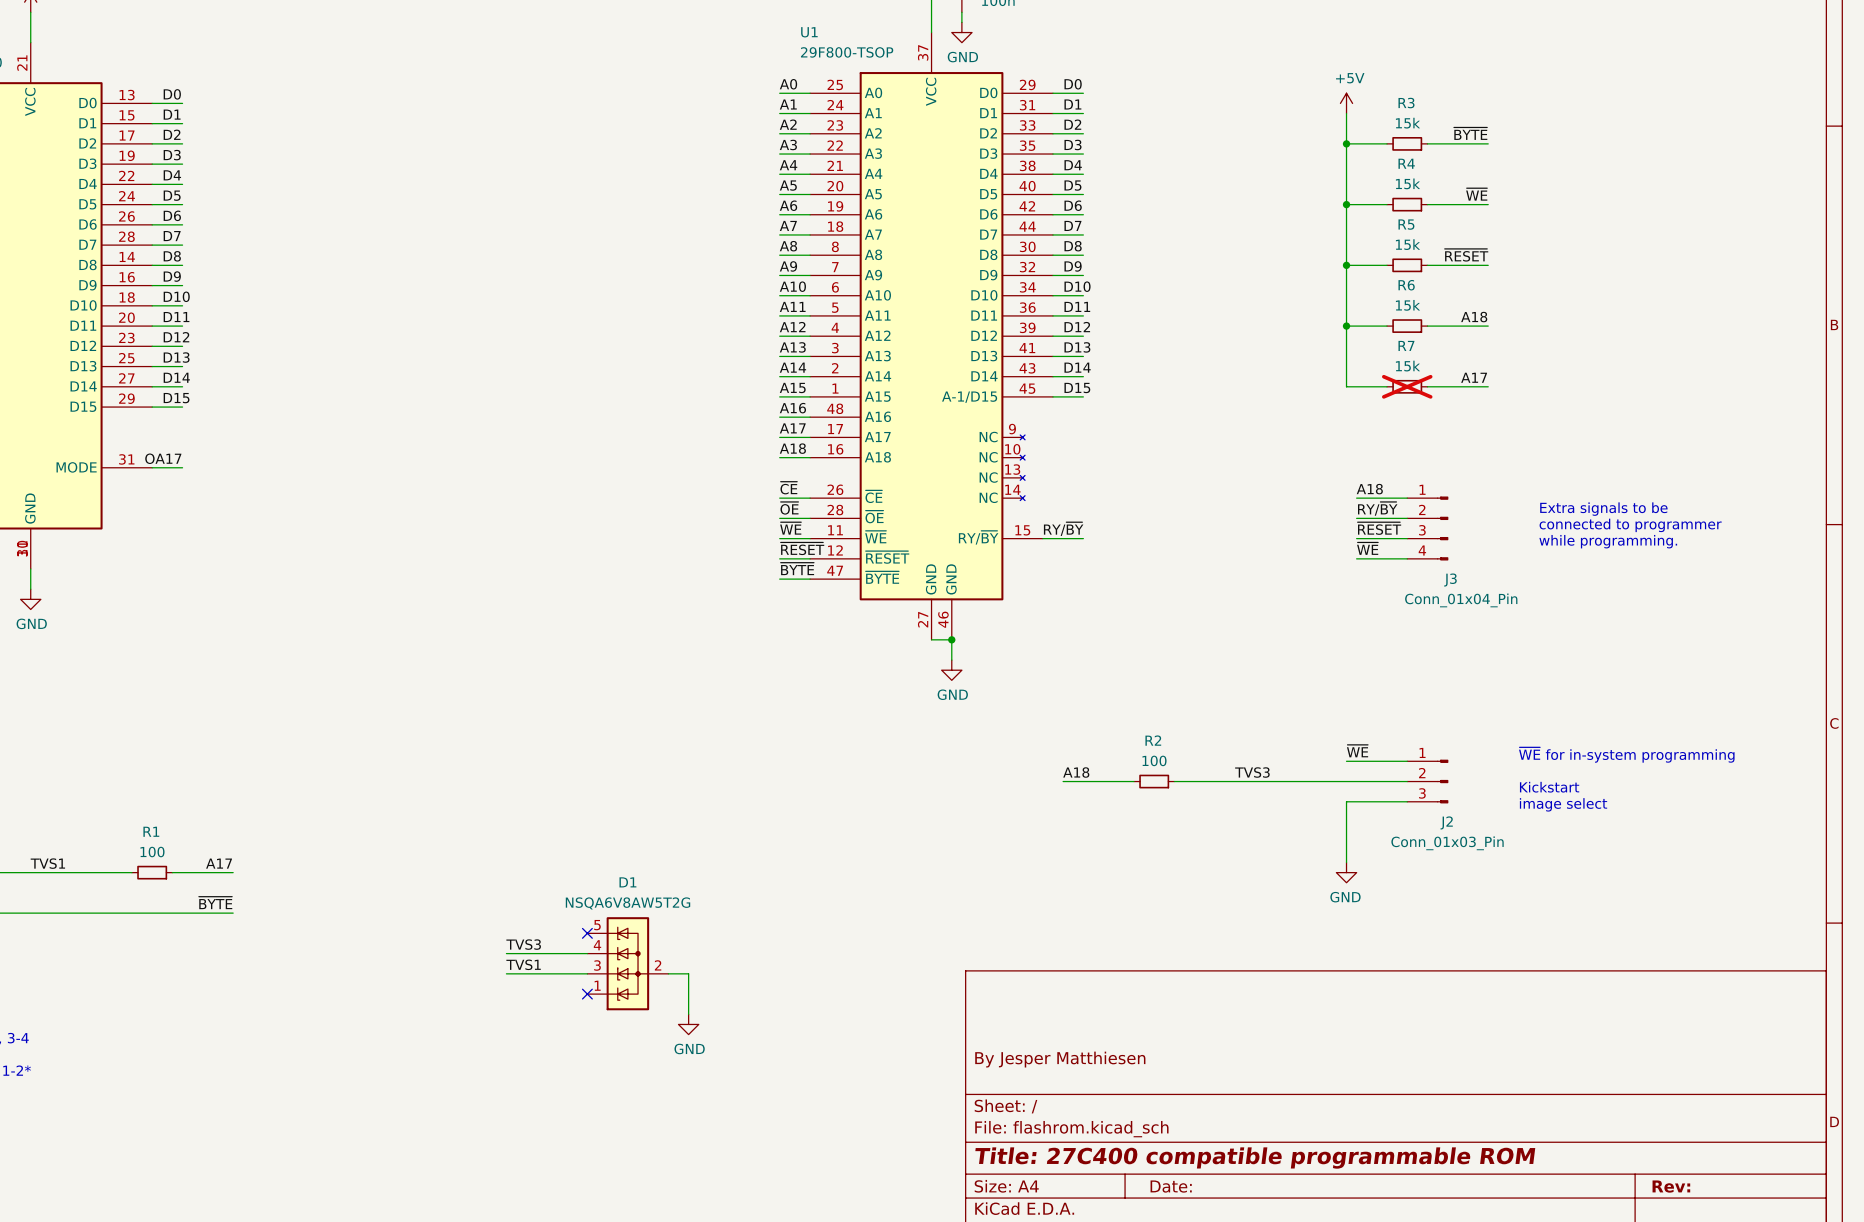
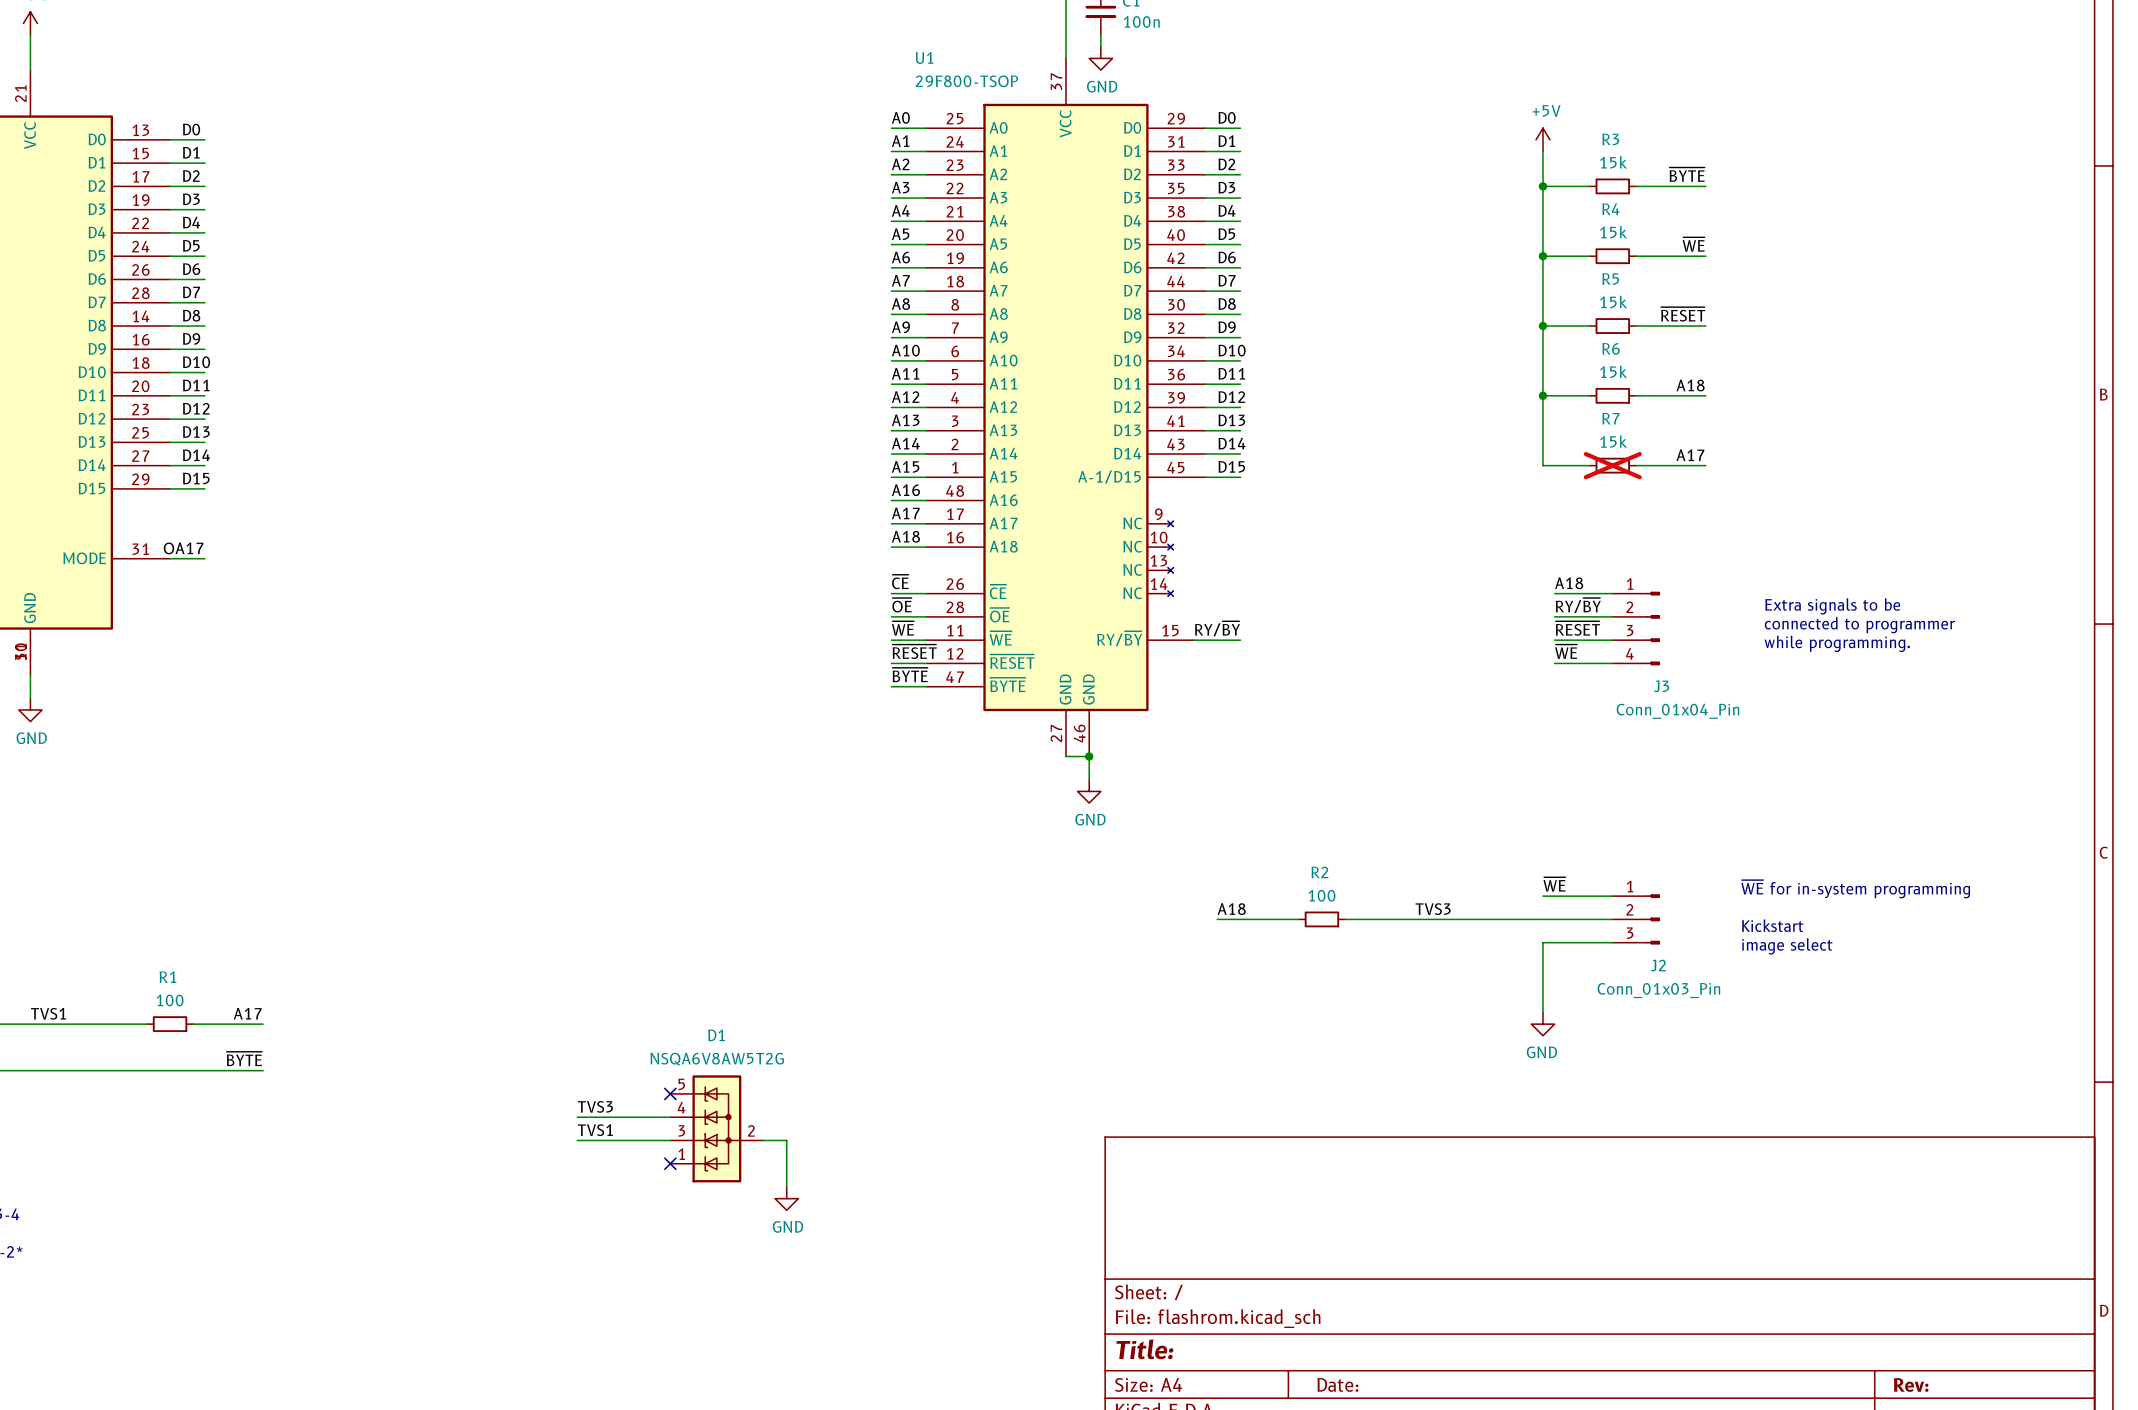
title block: By Jesper Matthiesen (1060, 1059) -> none
title block: Title: 27C400 compatible programmable ROM (1255, 1158) -> Title: (1144, 1349)

